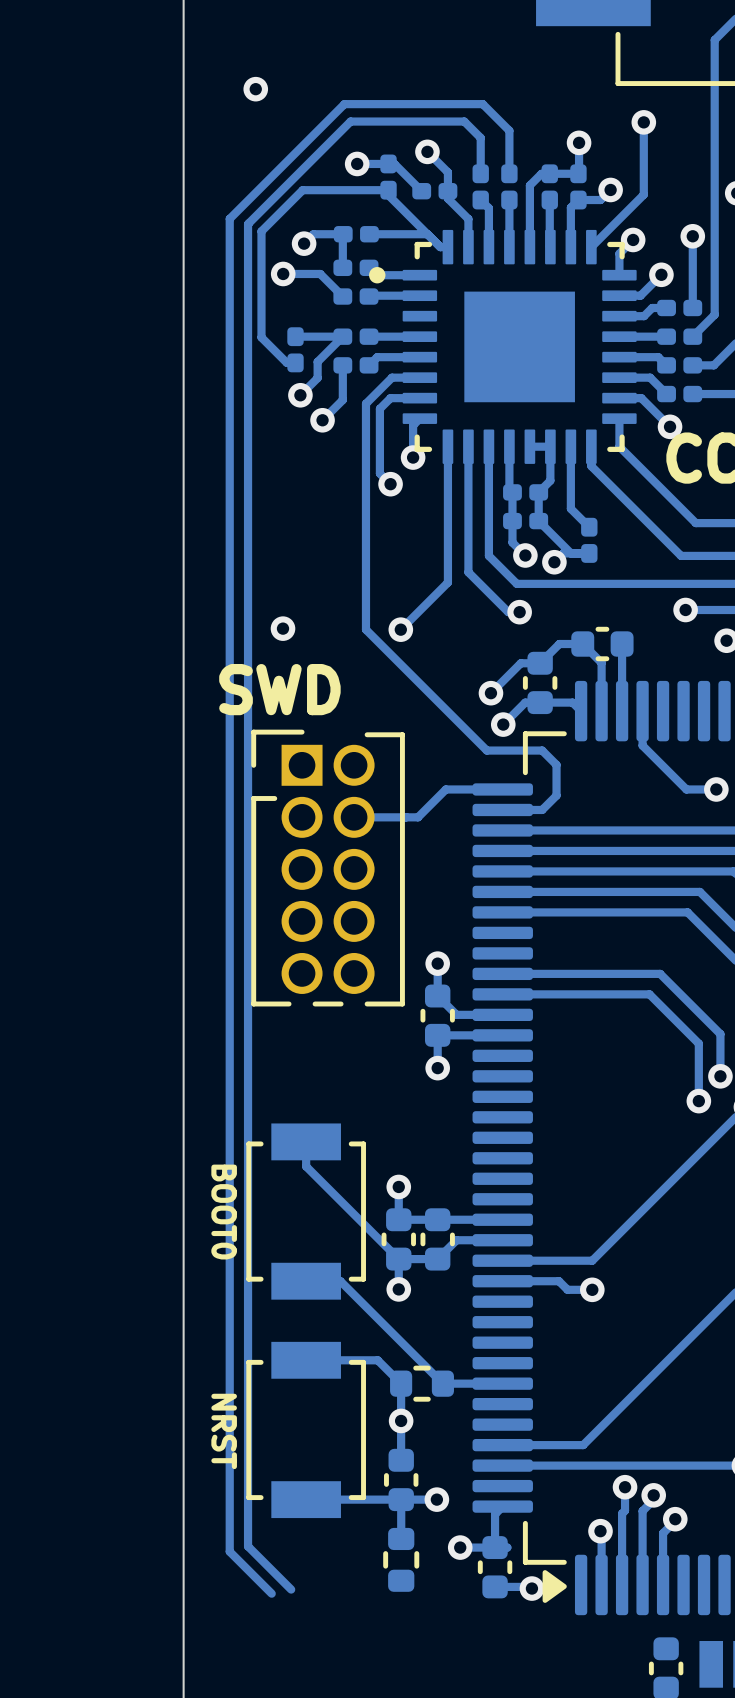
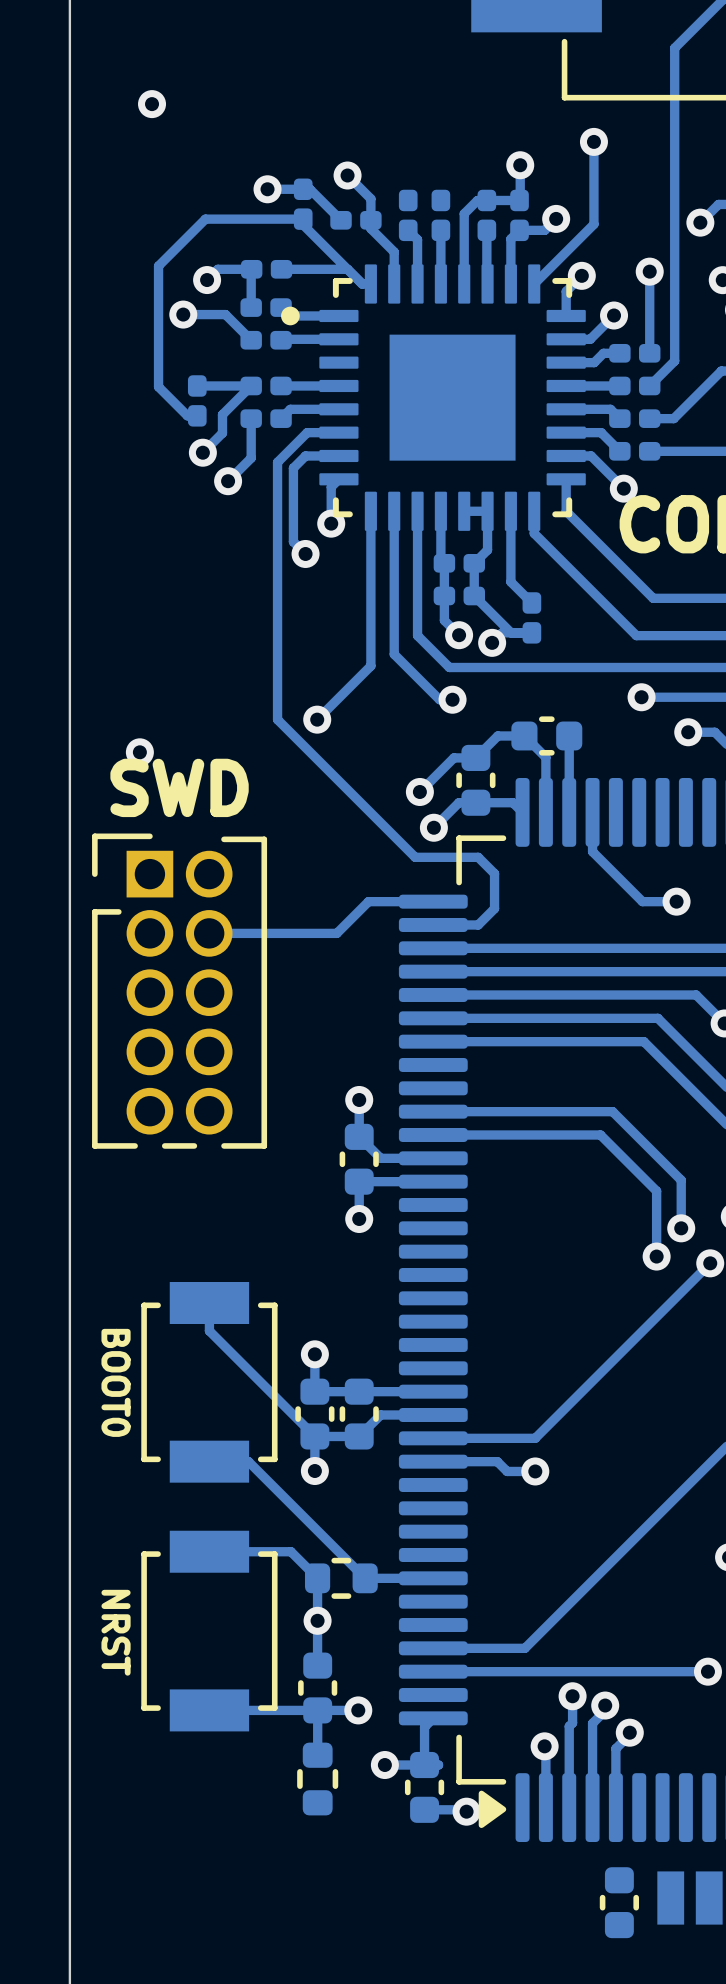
track: (480, 173) (480, 137) (464, 121) (350, 121) (248, 224) (248, 1546) (291, 1589) -> none
track: (509, 173) (509, 130) (482, 104) (344, 104) (229, 218) (229, 1551) (271, 1593) -> none
via position: (283, 628) -> (139, 752)
track: none -> (264, 933) (209, 933)
part position: (328, 868) -> (179, 991)

